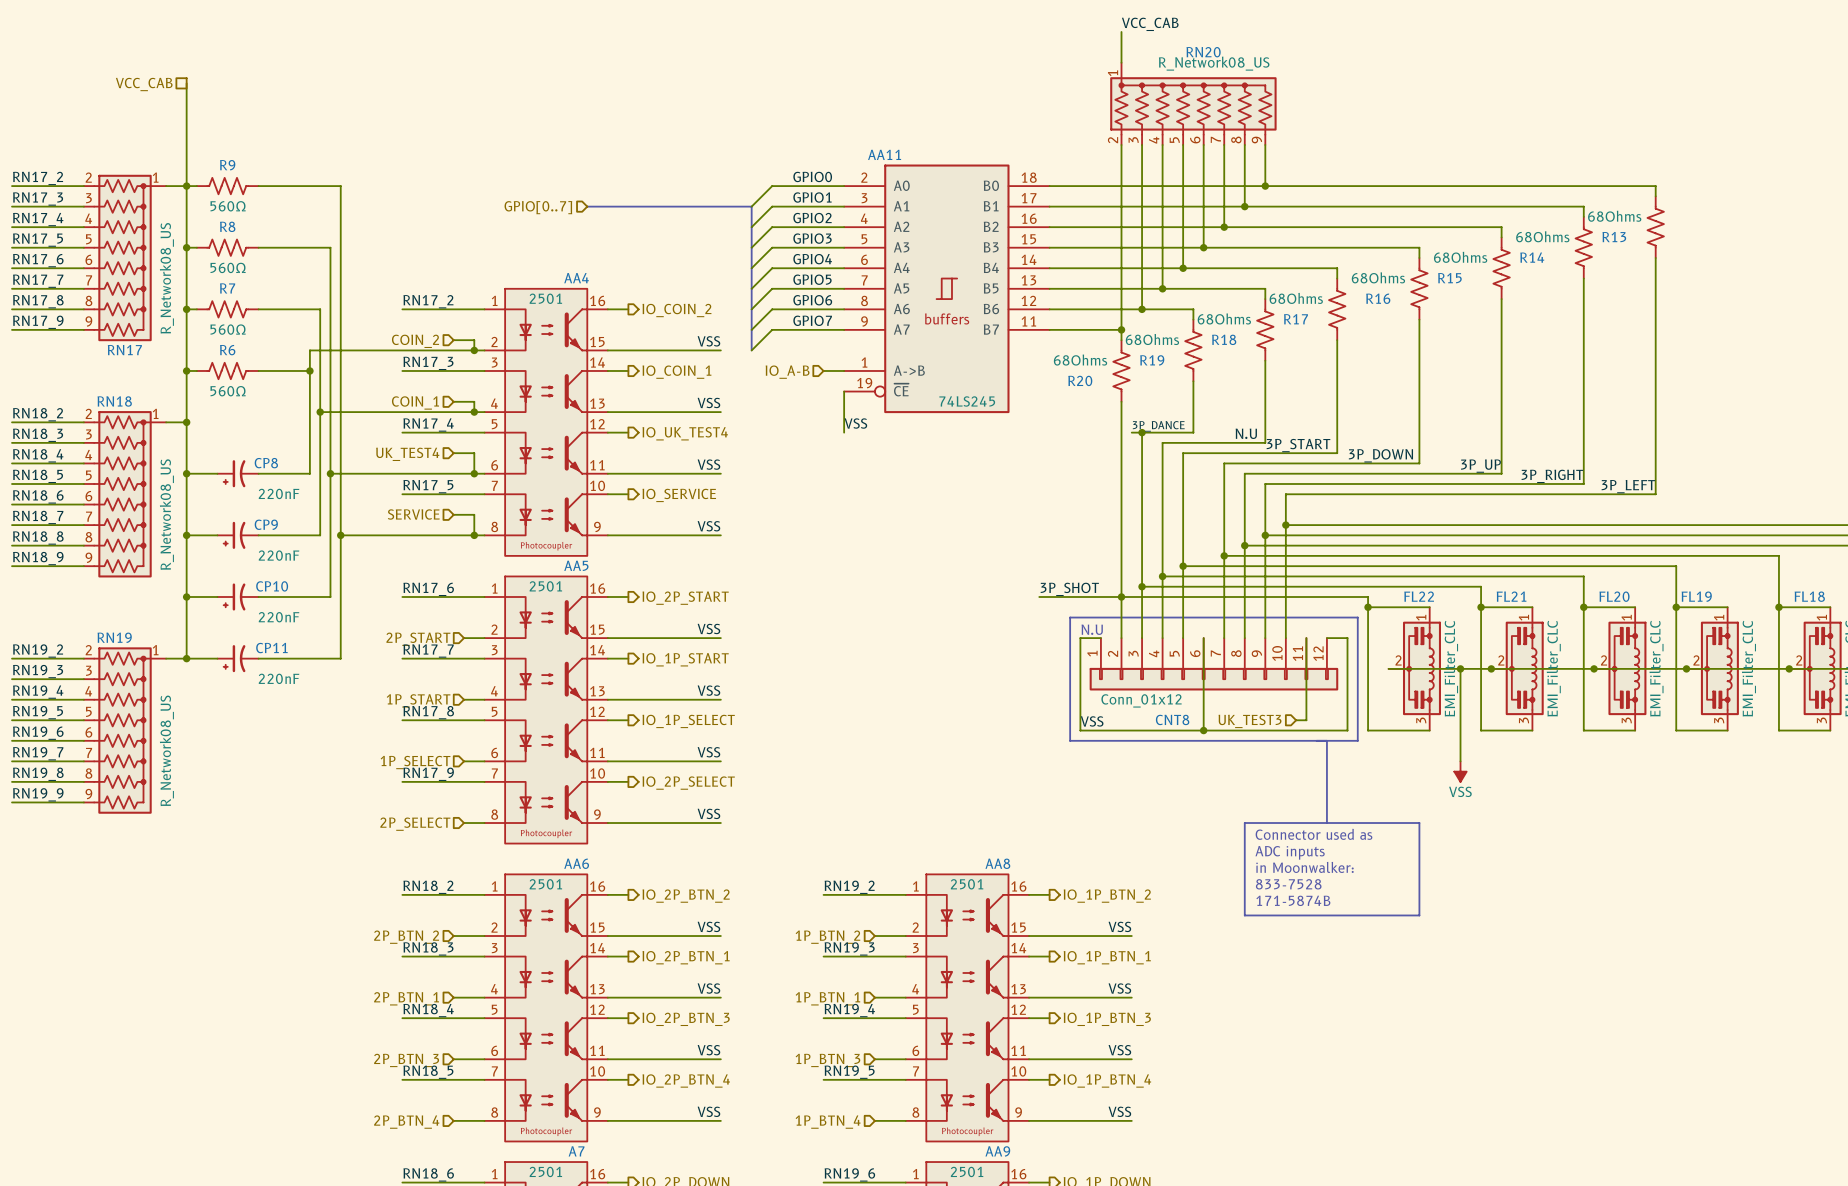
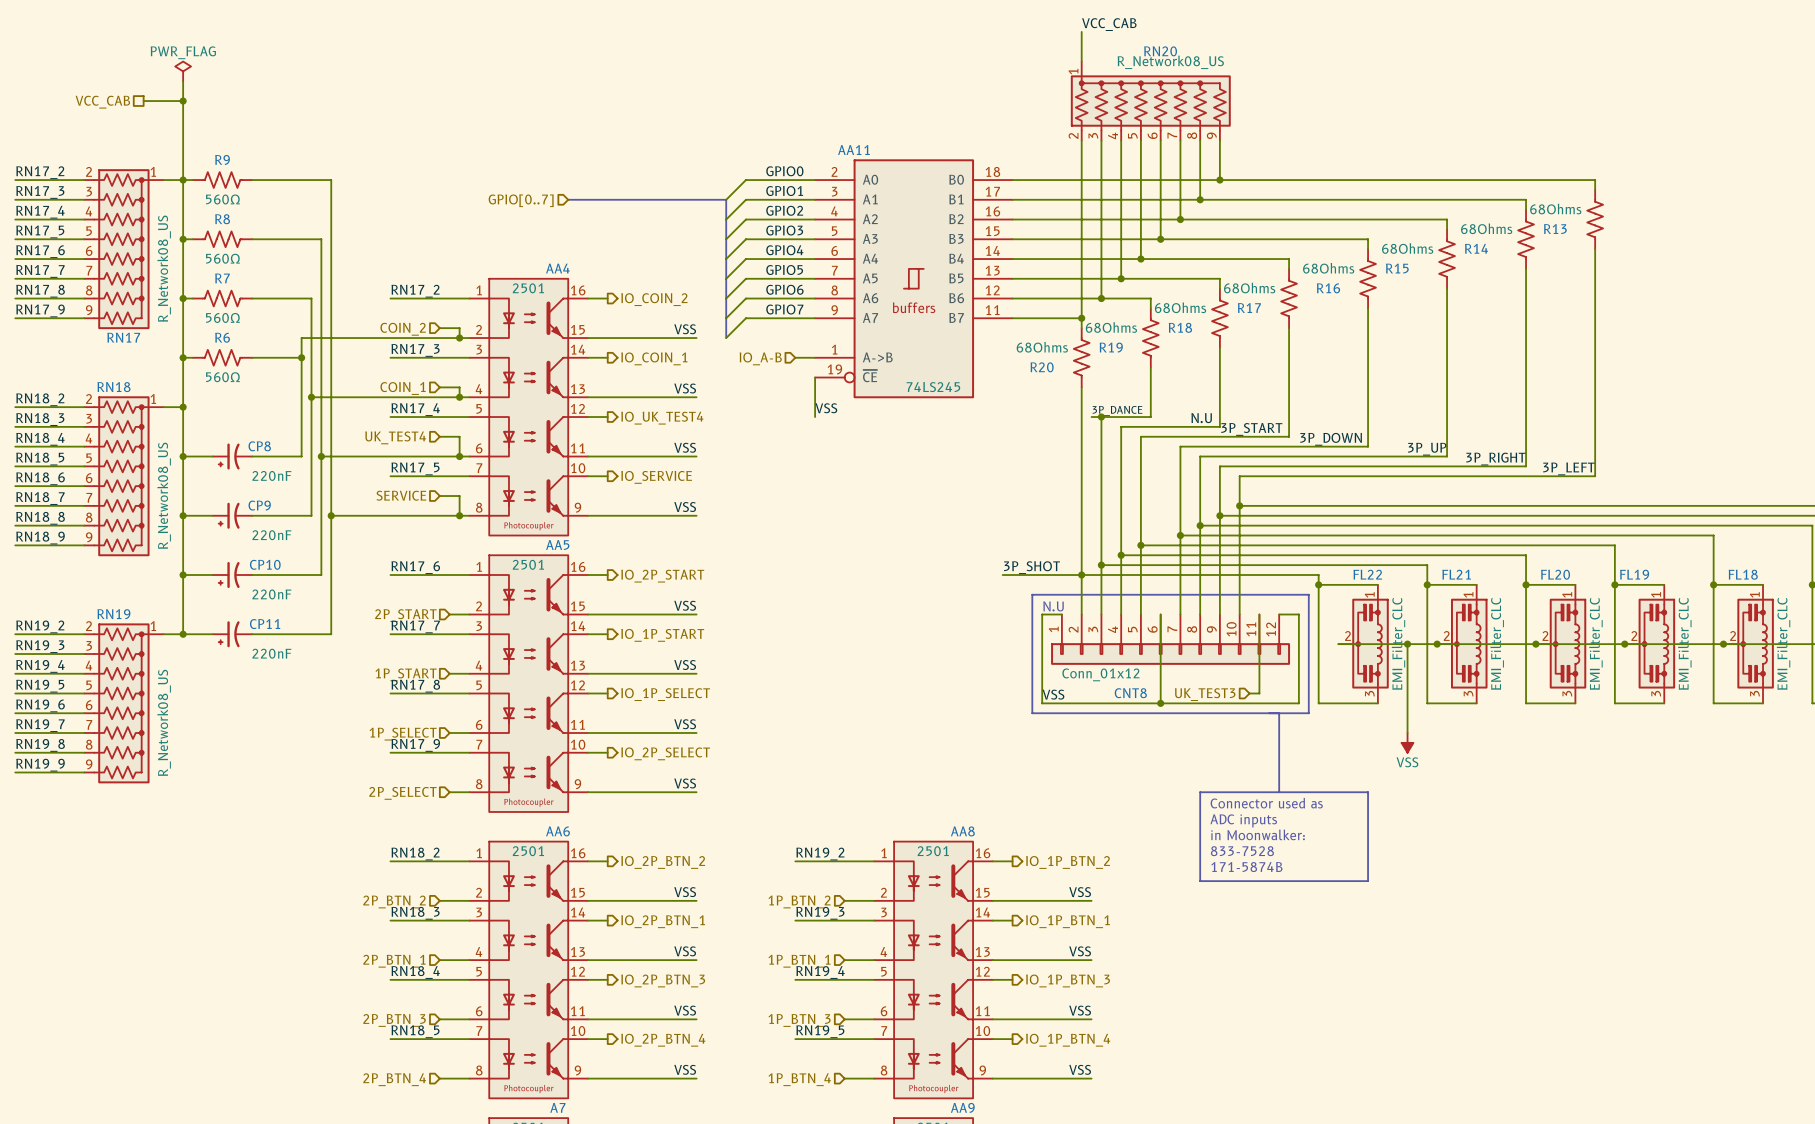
power symbol: none -> PWR_FLAG (183, 71)
hierarchical label position: VCC_CAB (144, 84) -> VCC_CAB (102, 102)
wire: none -> (143, 101) (183, 101)
junction: none -> (183, 101)

